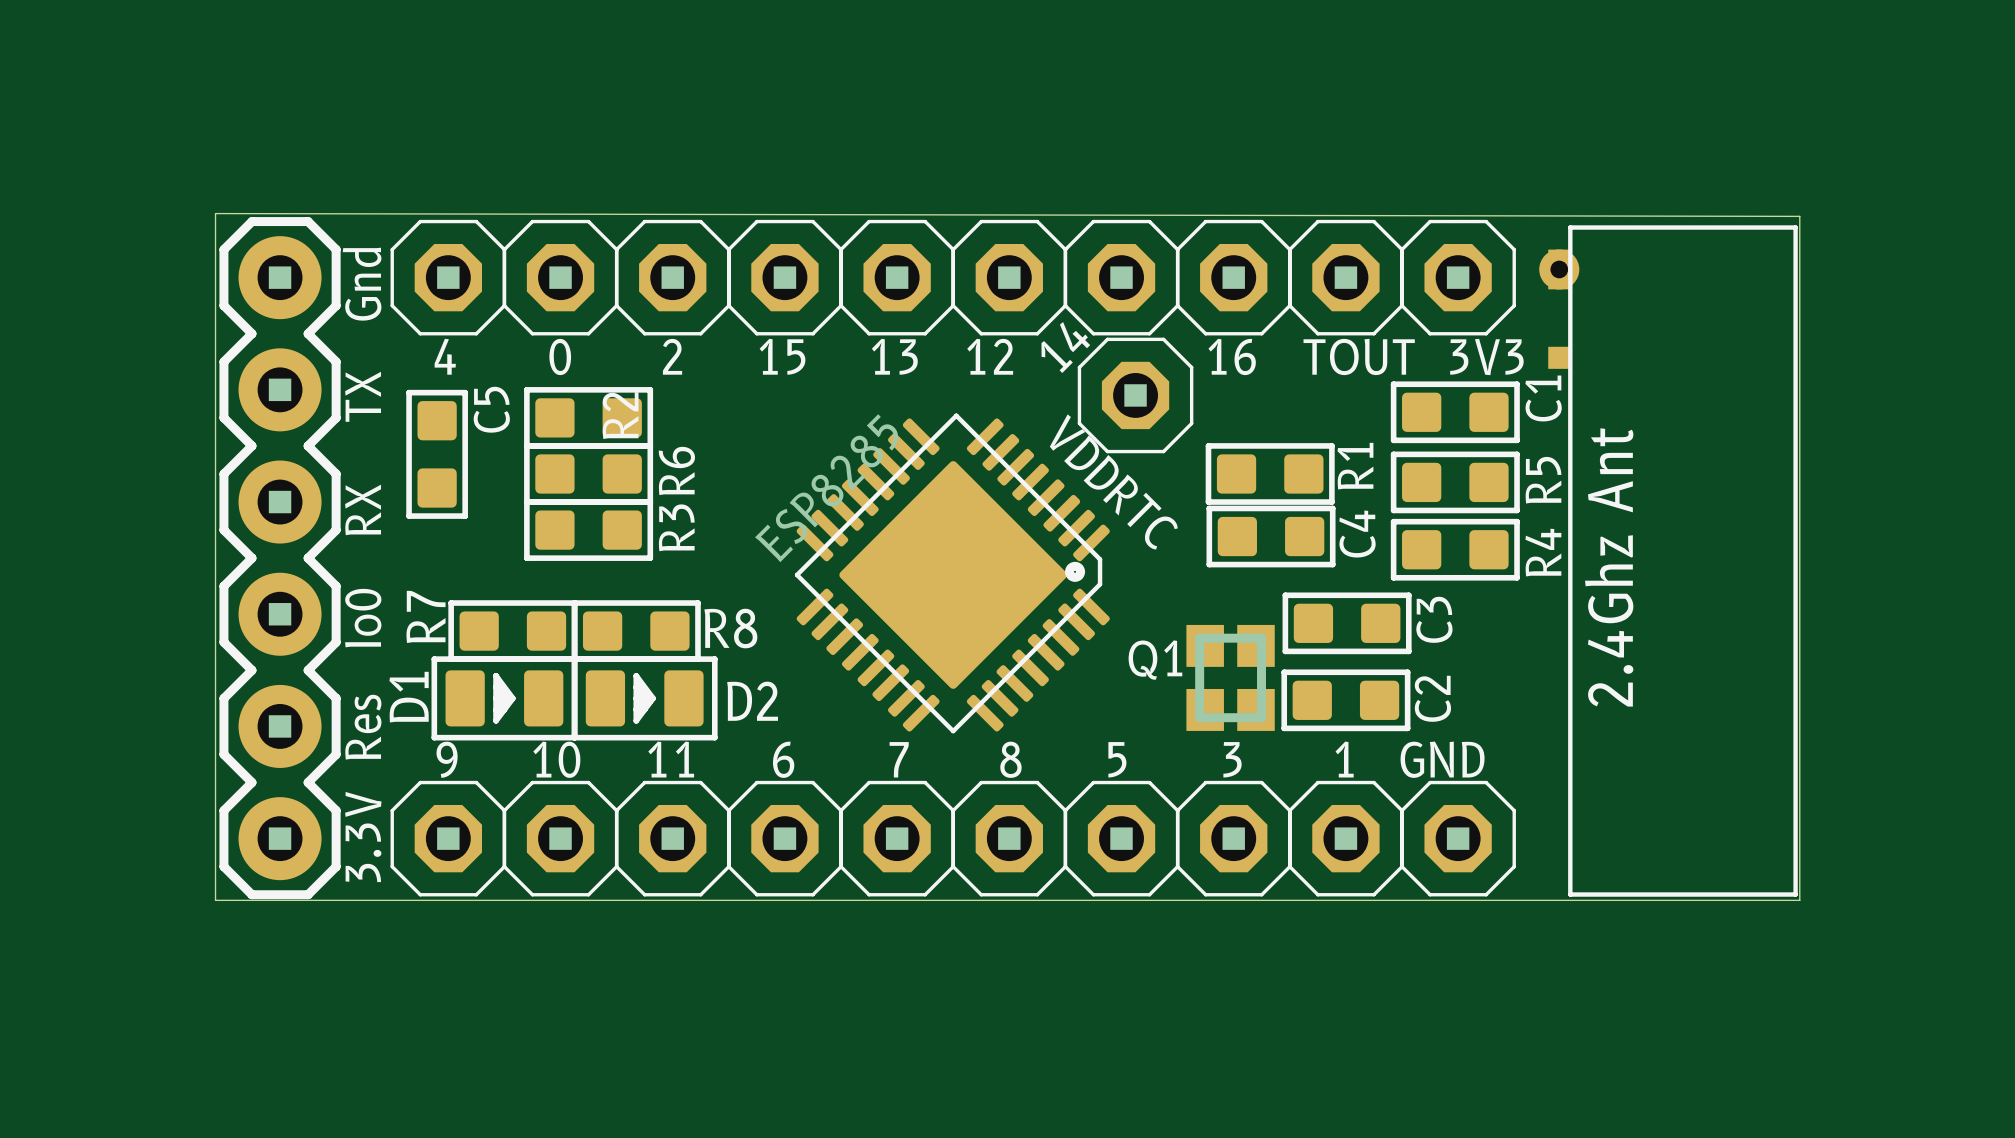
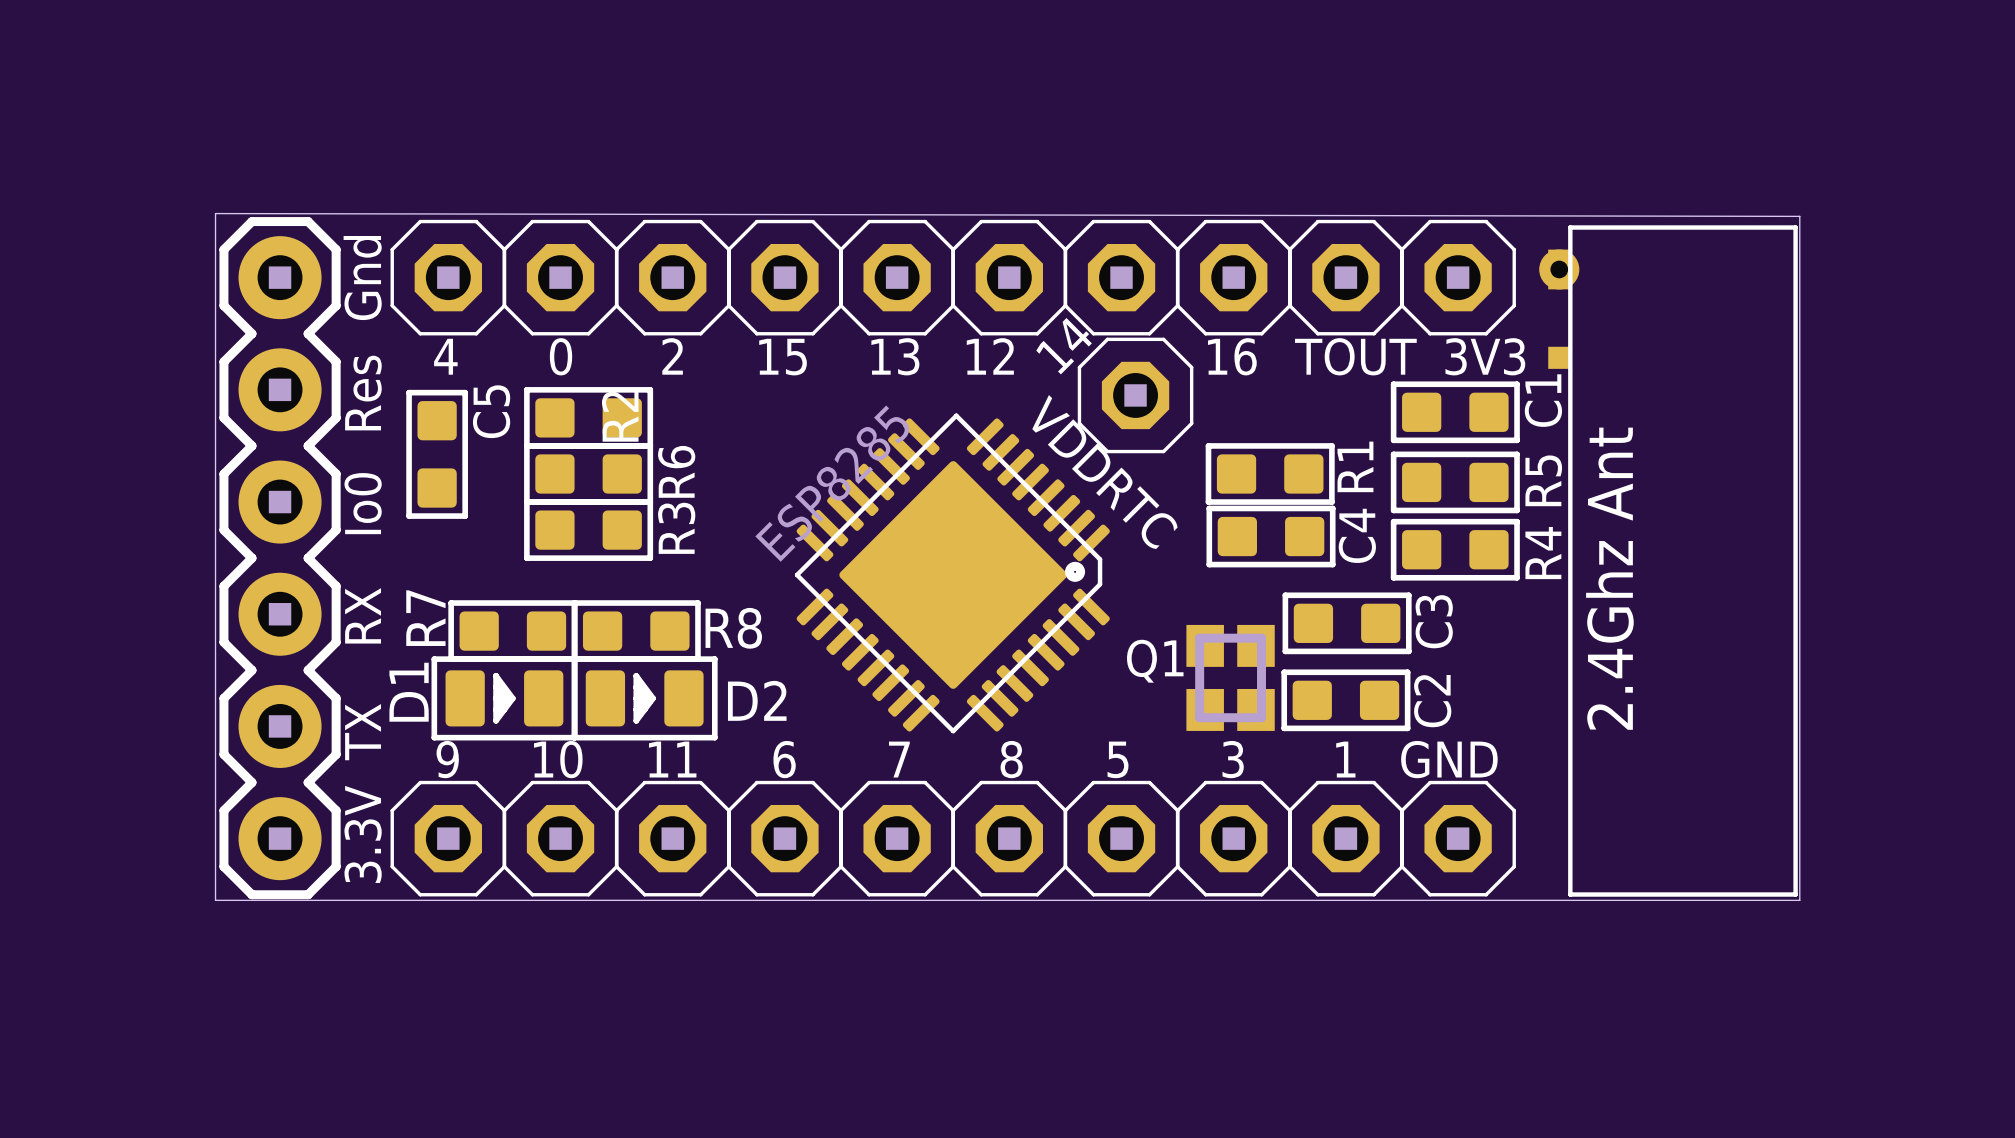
text: TX (363, 396) -> Res (363, 393)
text: RX (363, 509) -> Io0 (363, 503)
text: Io0 (363, 618) -> RX (363, 615)
text: Res (363, 727) -> TX (363, 732)

